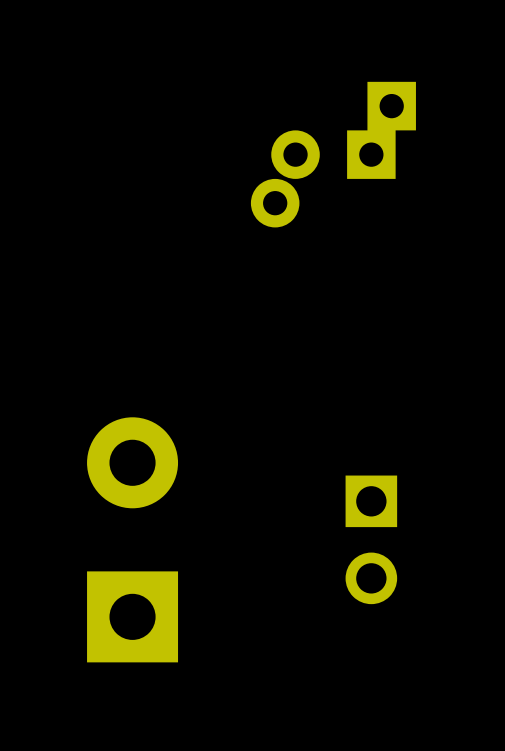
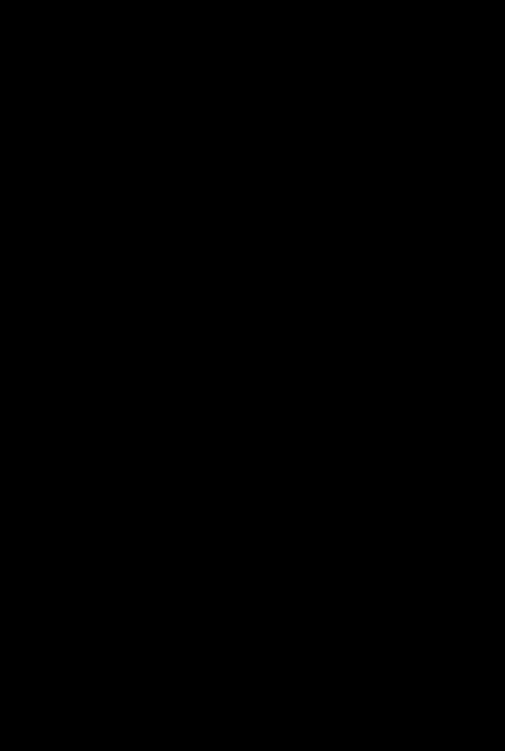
part: (333, 154) -> none
part: (132, 539) -> none
part: (371, 539) -> none

